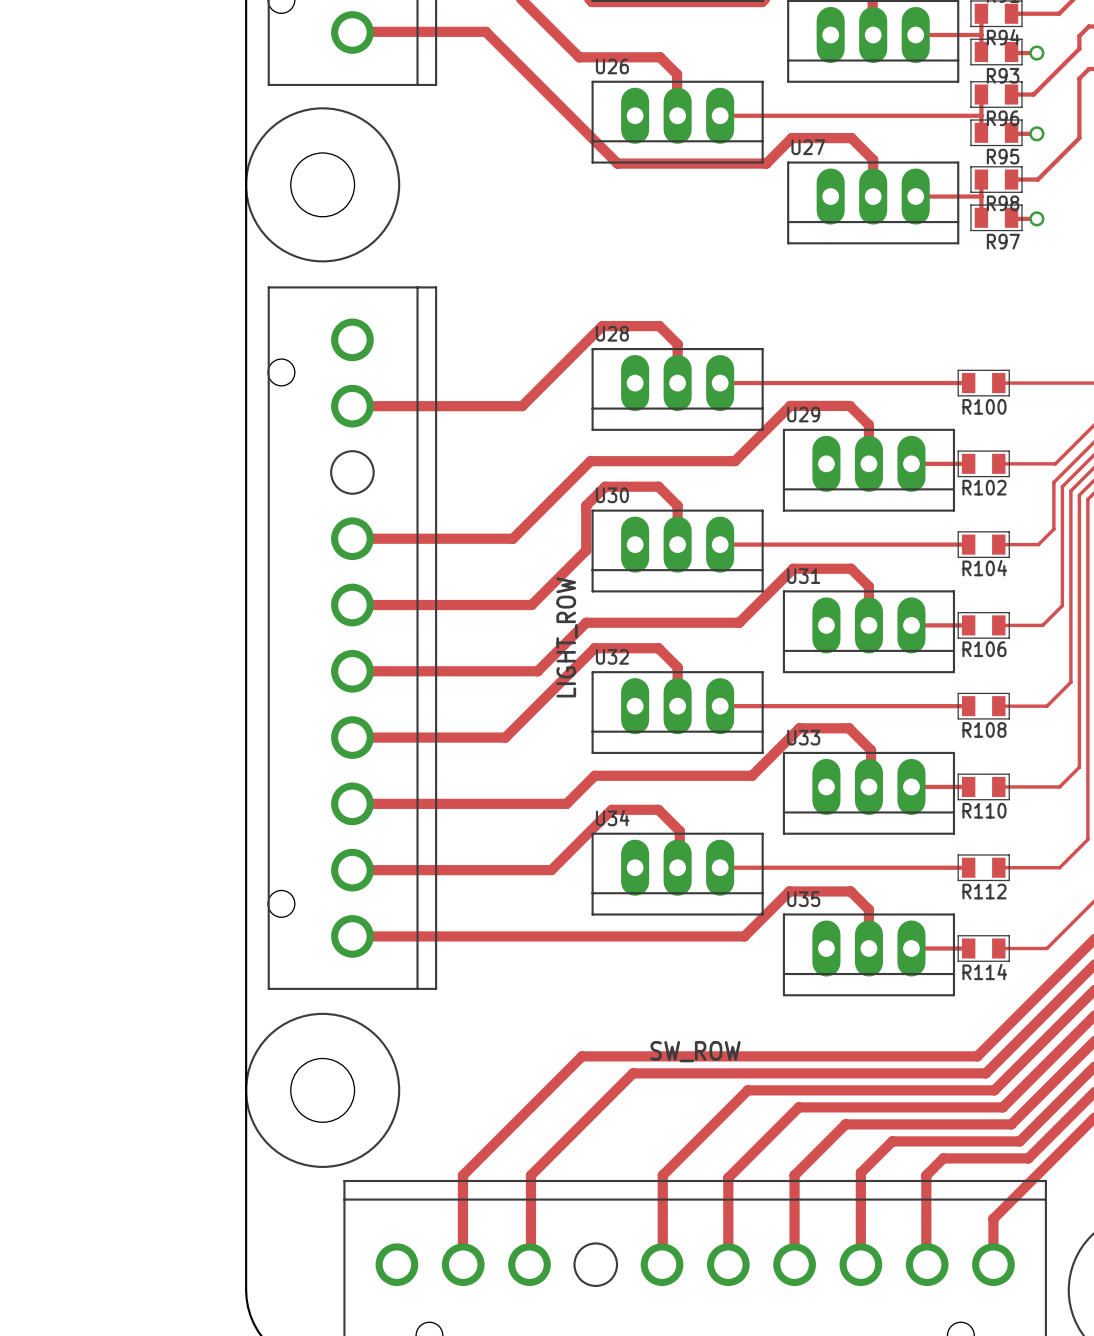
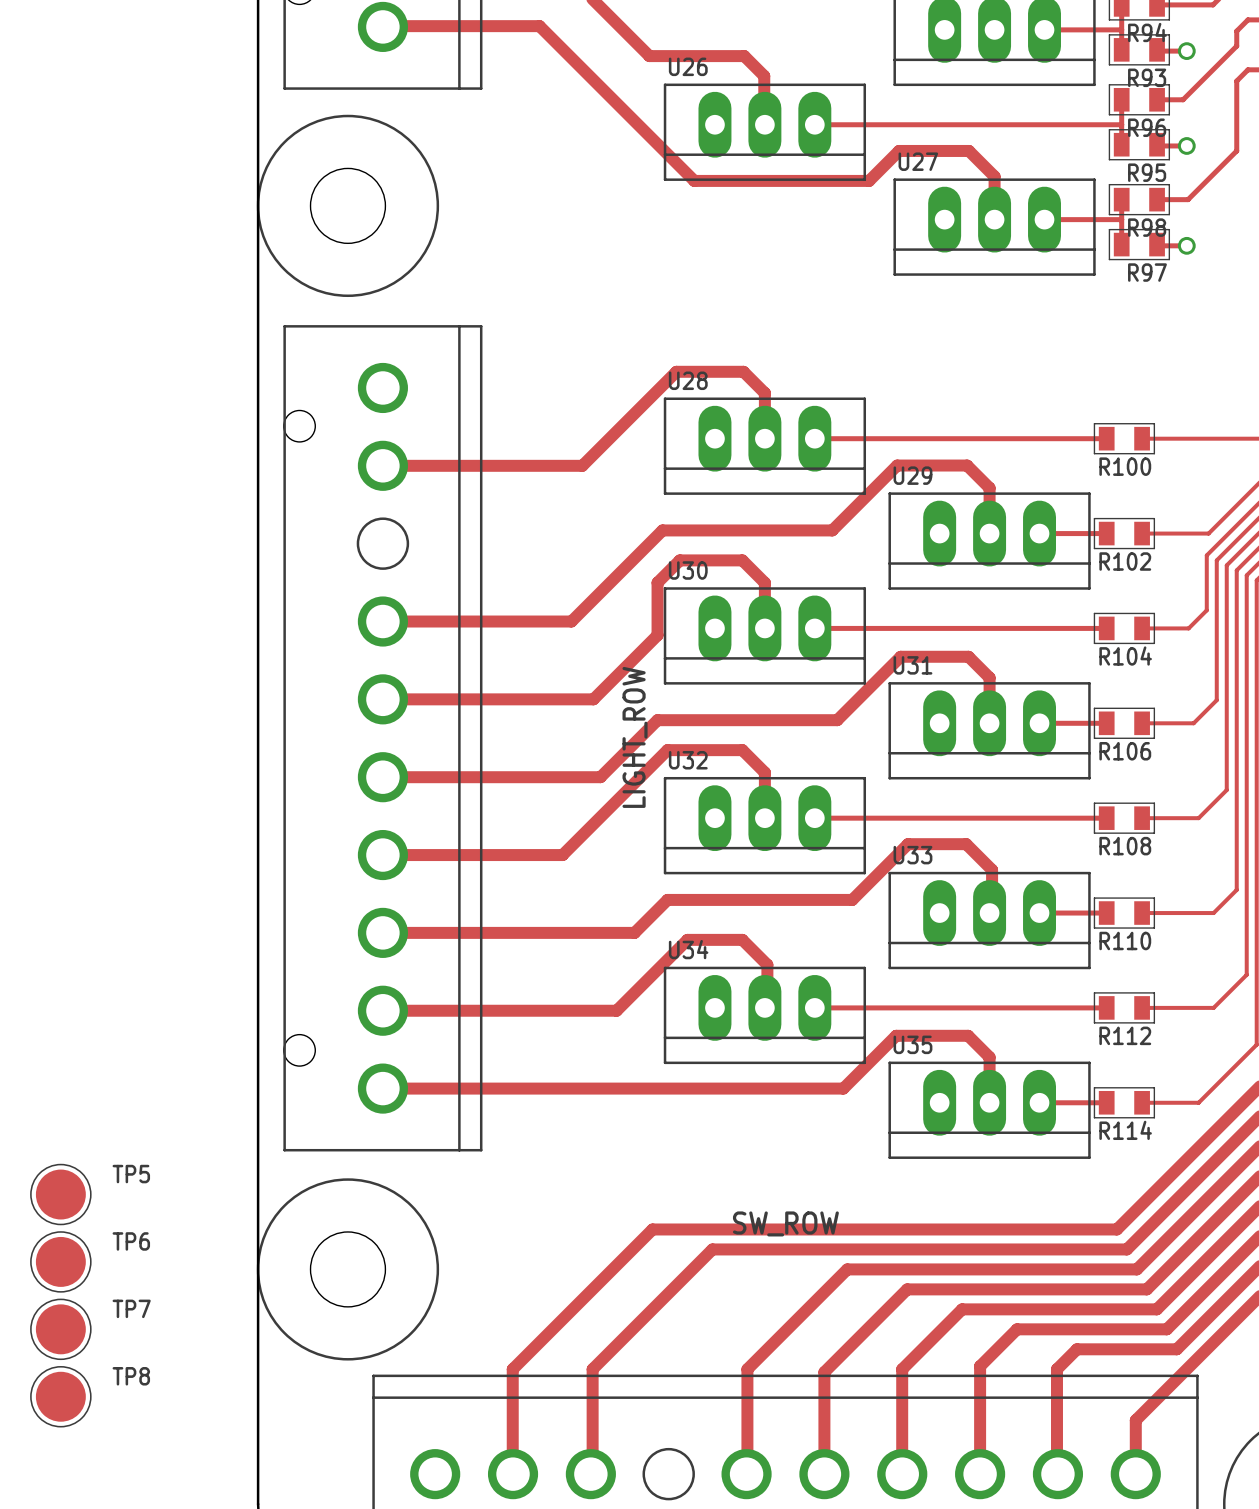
TP5: none -> (60, 1194)
TP6: none -> (60, 1261)
TP7: none -> (60, 1329)
TP8: none -> (60, 1396)

